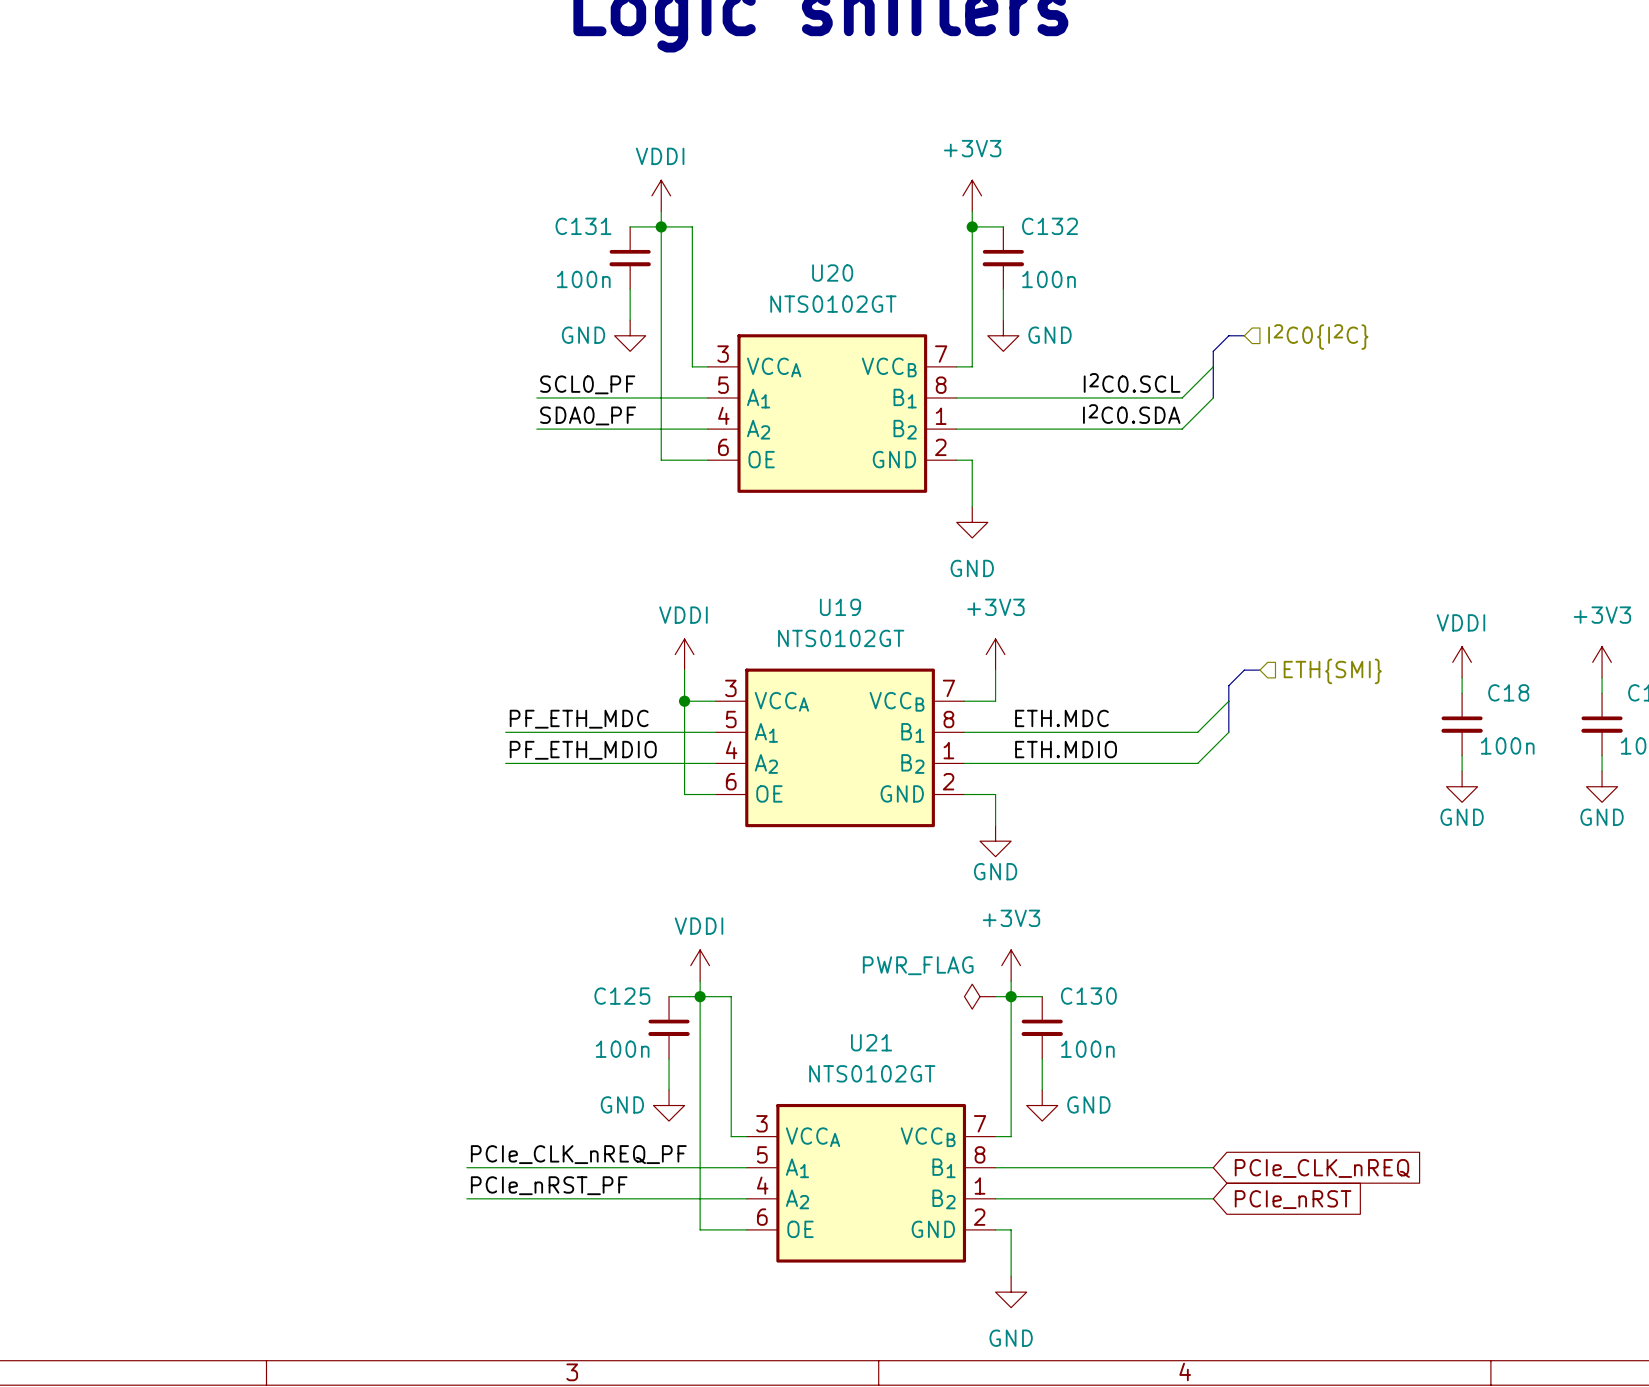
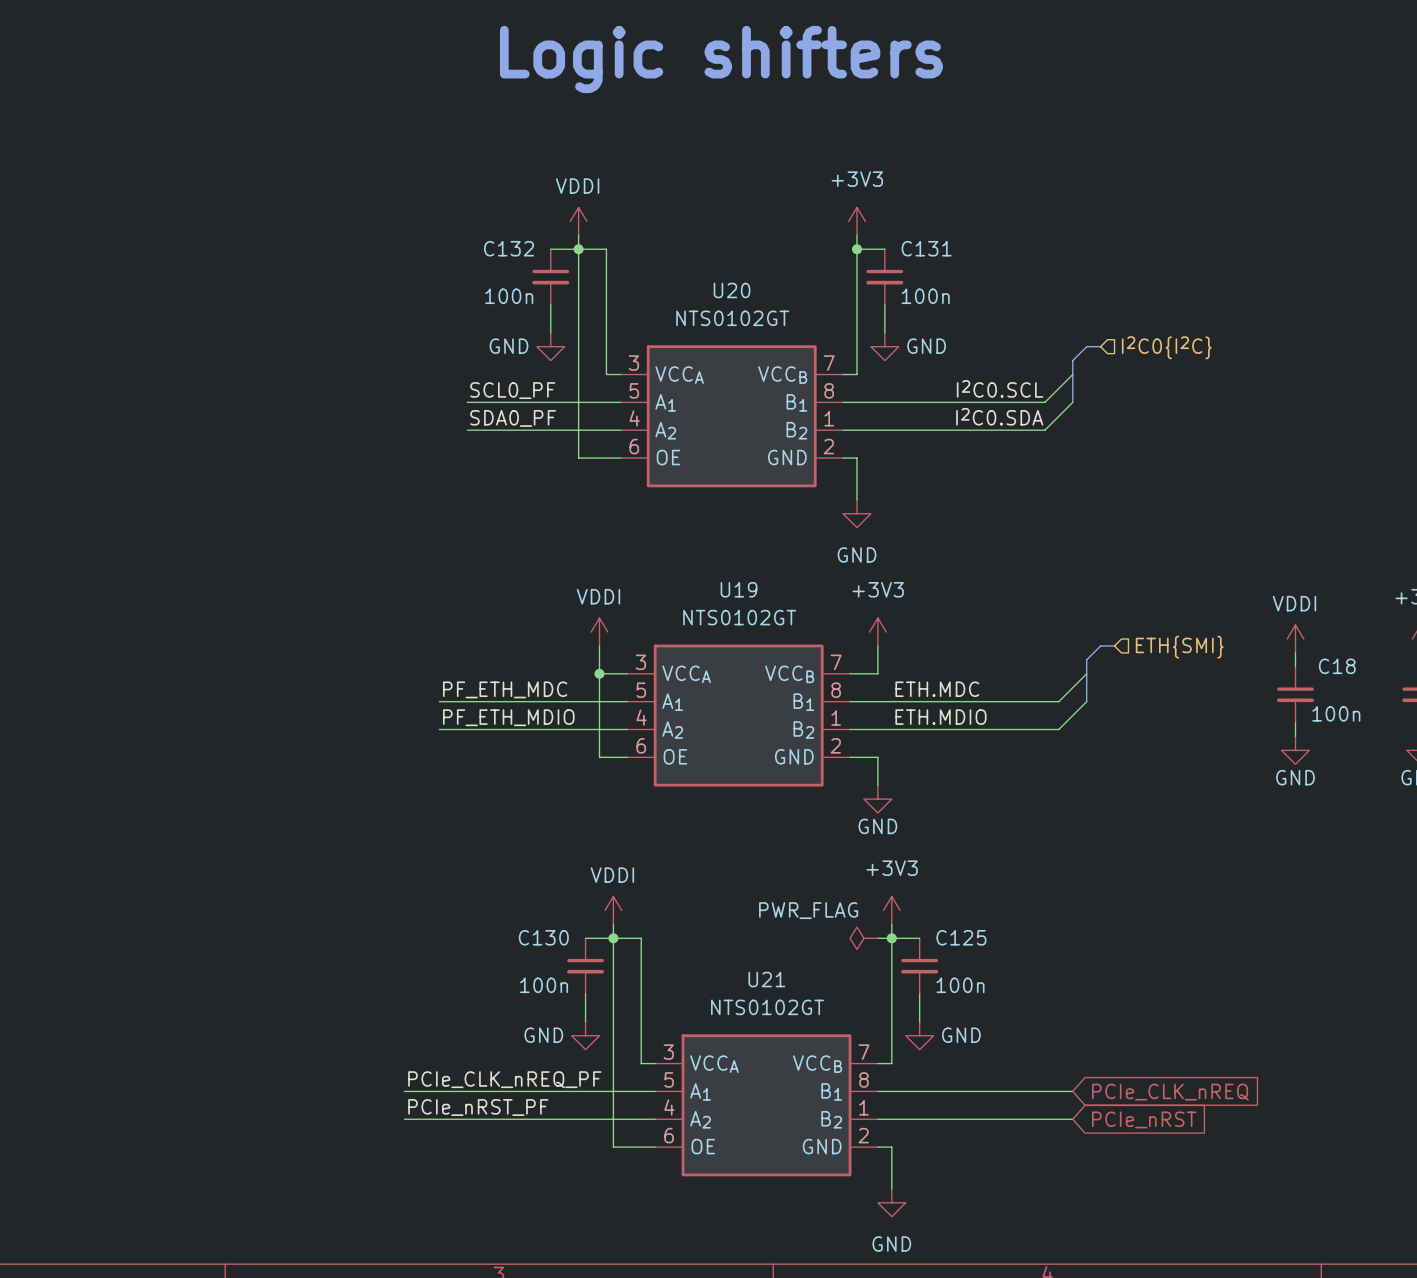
C131 name: C131 (583, 226) -> C132 (509, 248)
C132 name: C132 (1050, 226) -> C131 (926, 248)
C125 name: C125 (622, 996) -> C130 (543, 937)
C130 name: C130 (1088, 996) -> C125 (961, 937)

